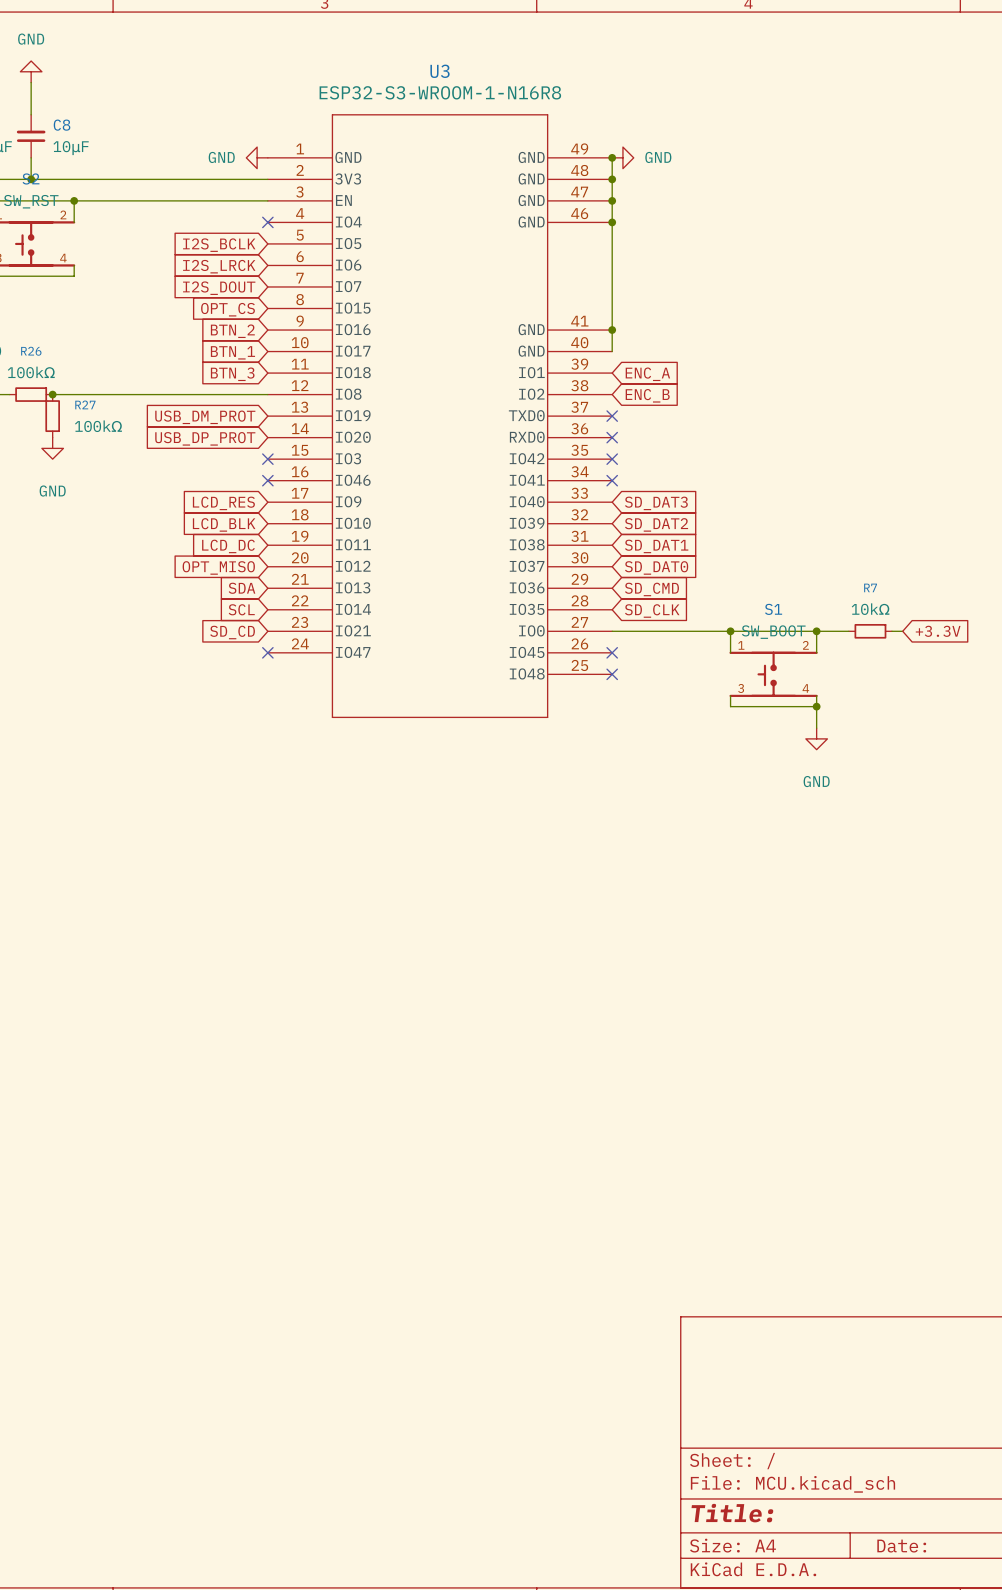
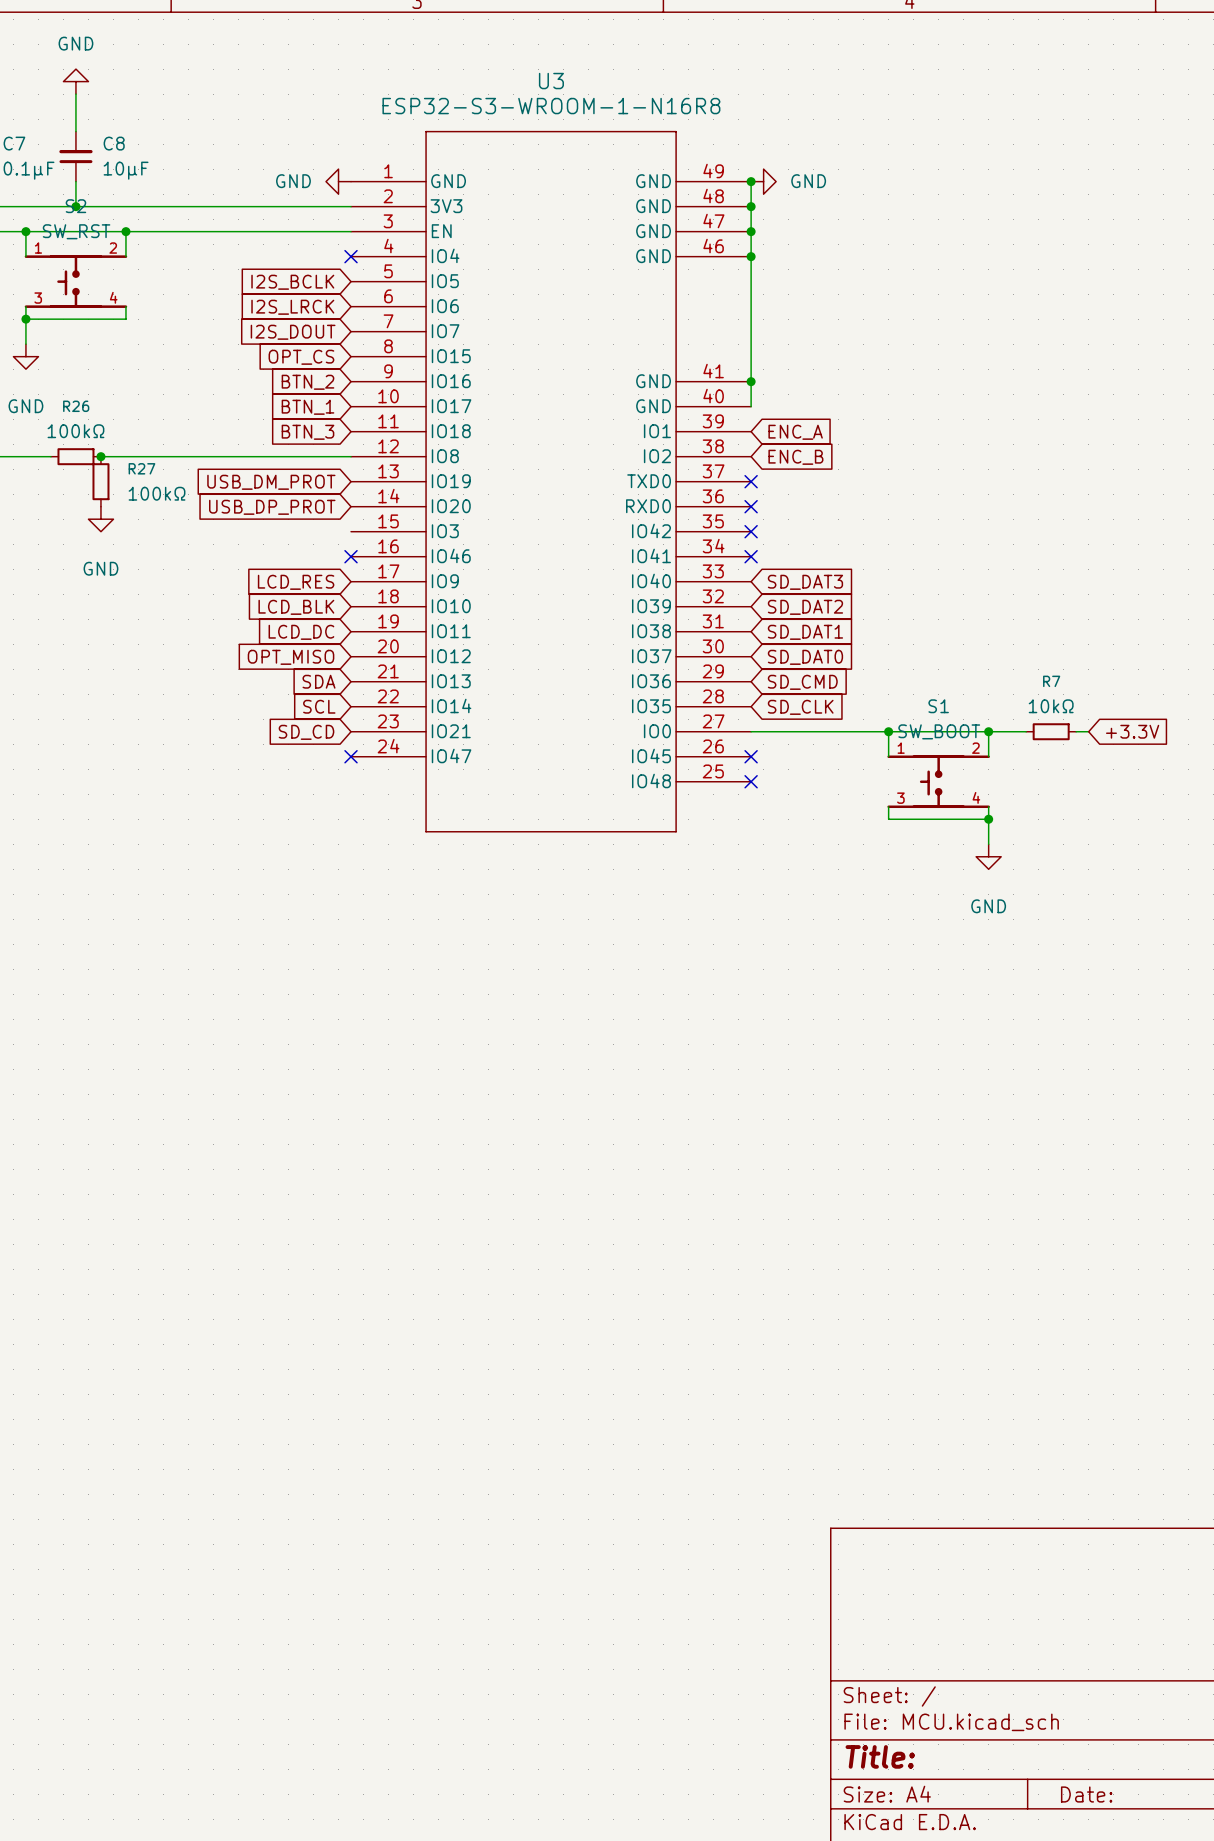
no-connect mark: (267, 459) -> none

